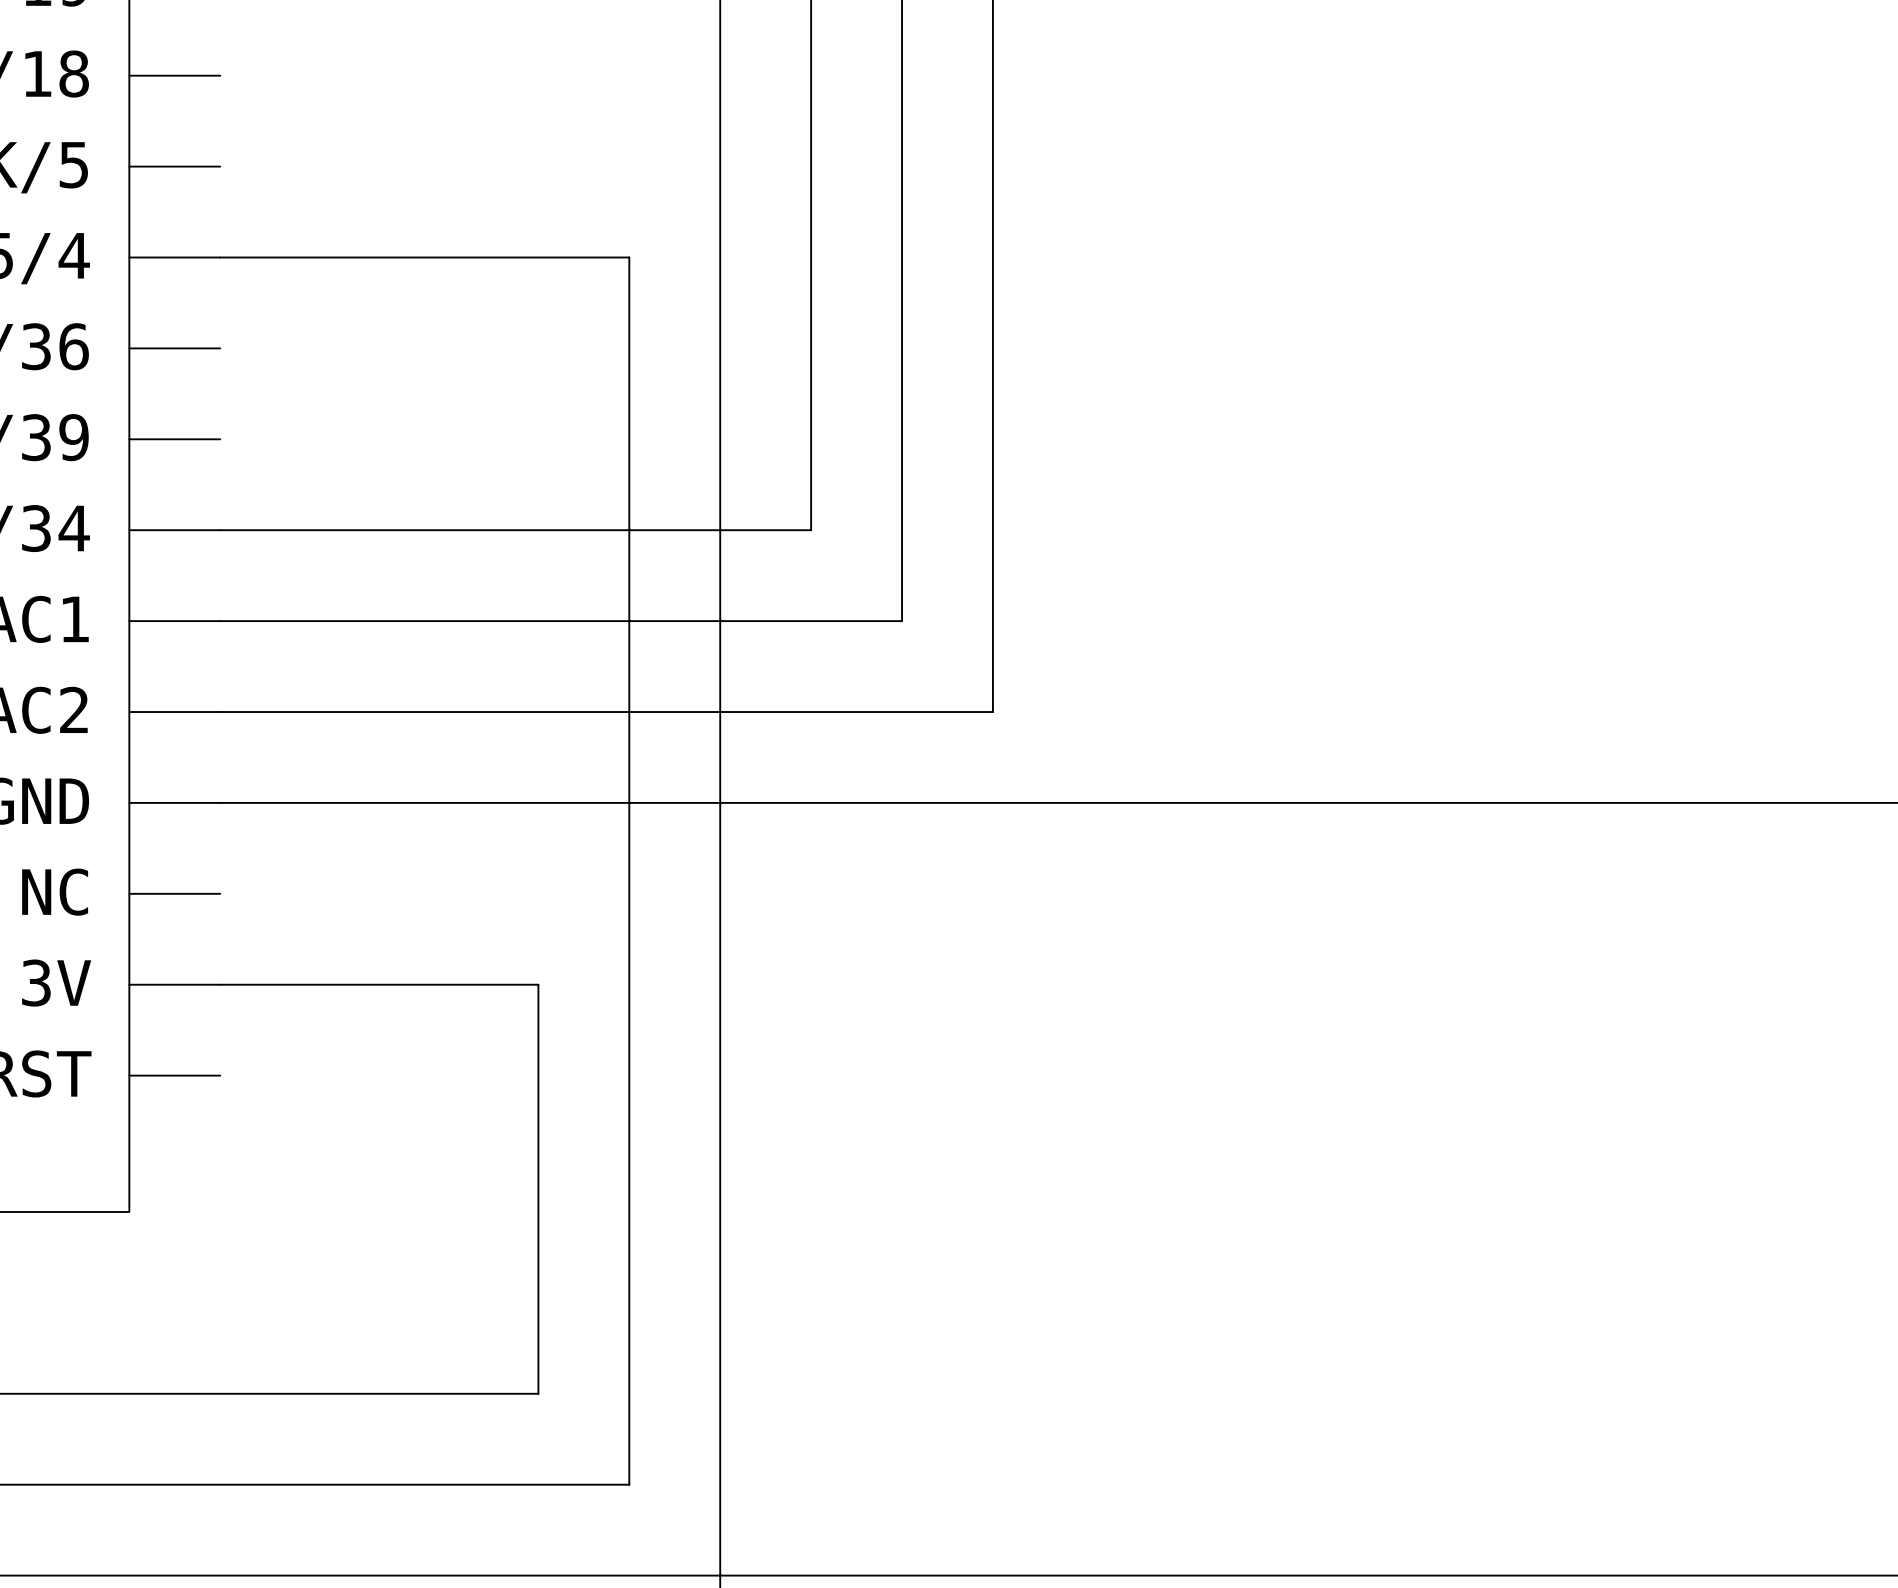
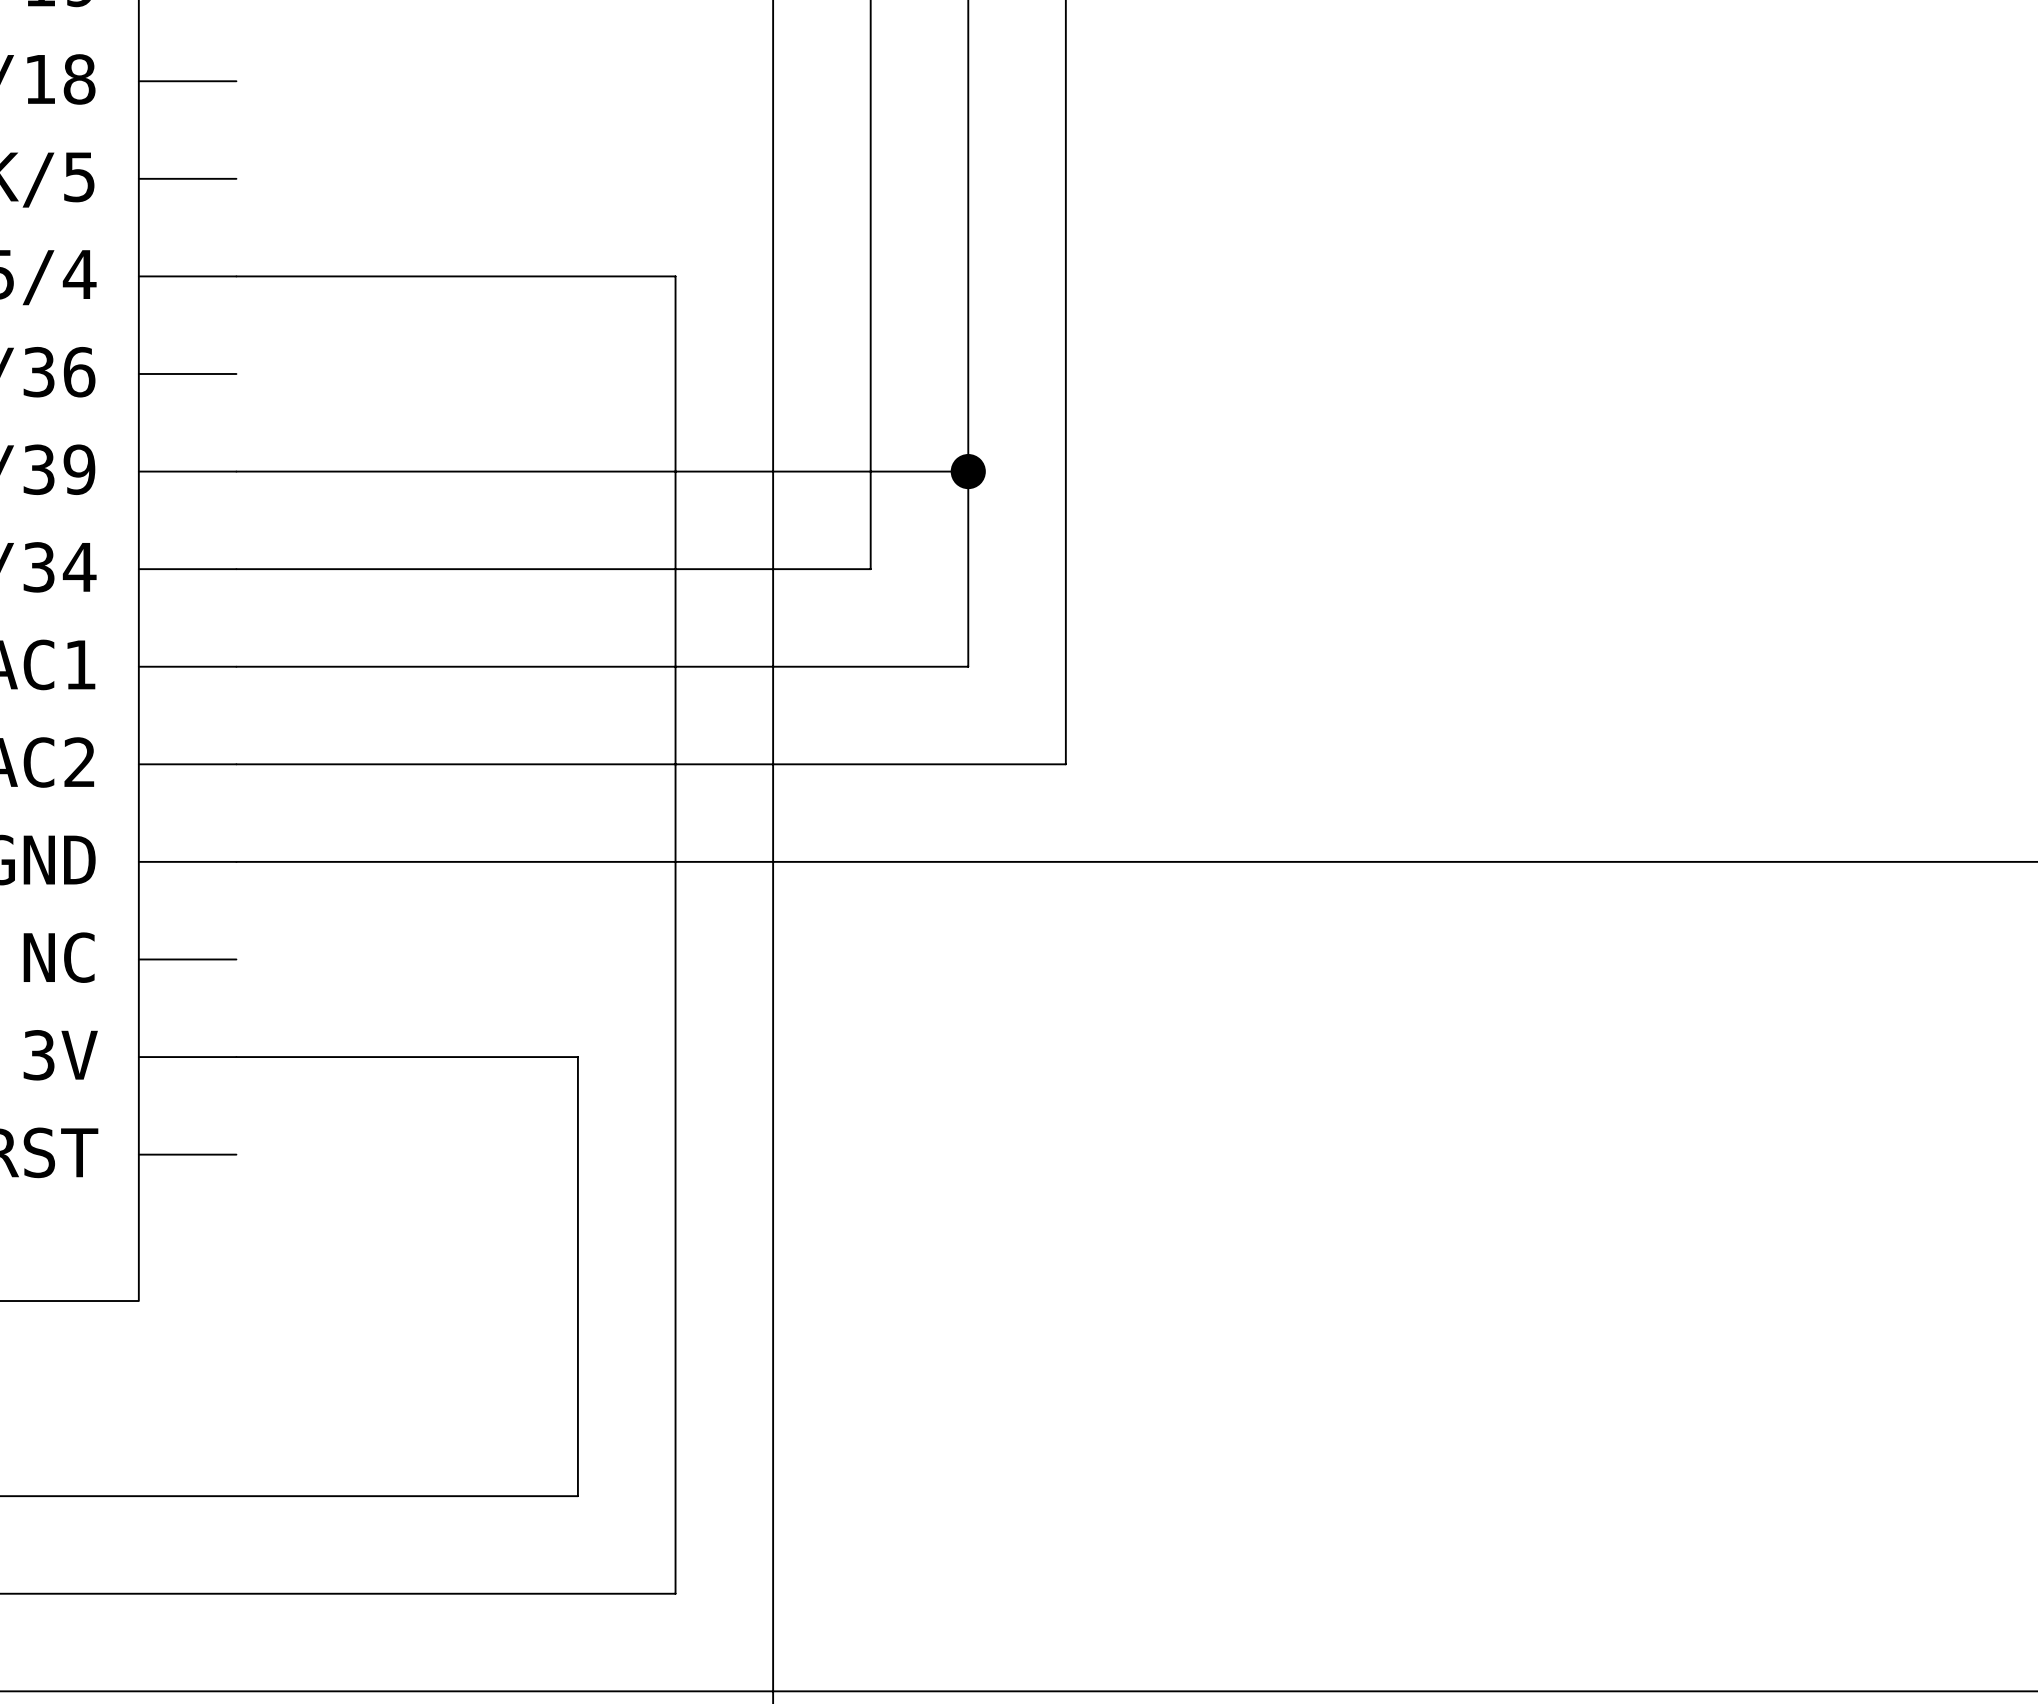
wire: none -> (236, 471) (968, 471)
junction: none -> (968, 471)

